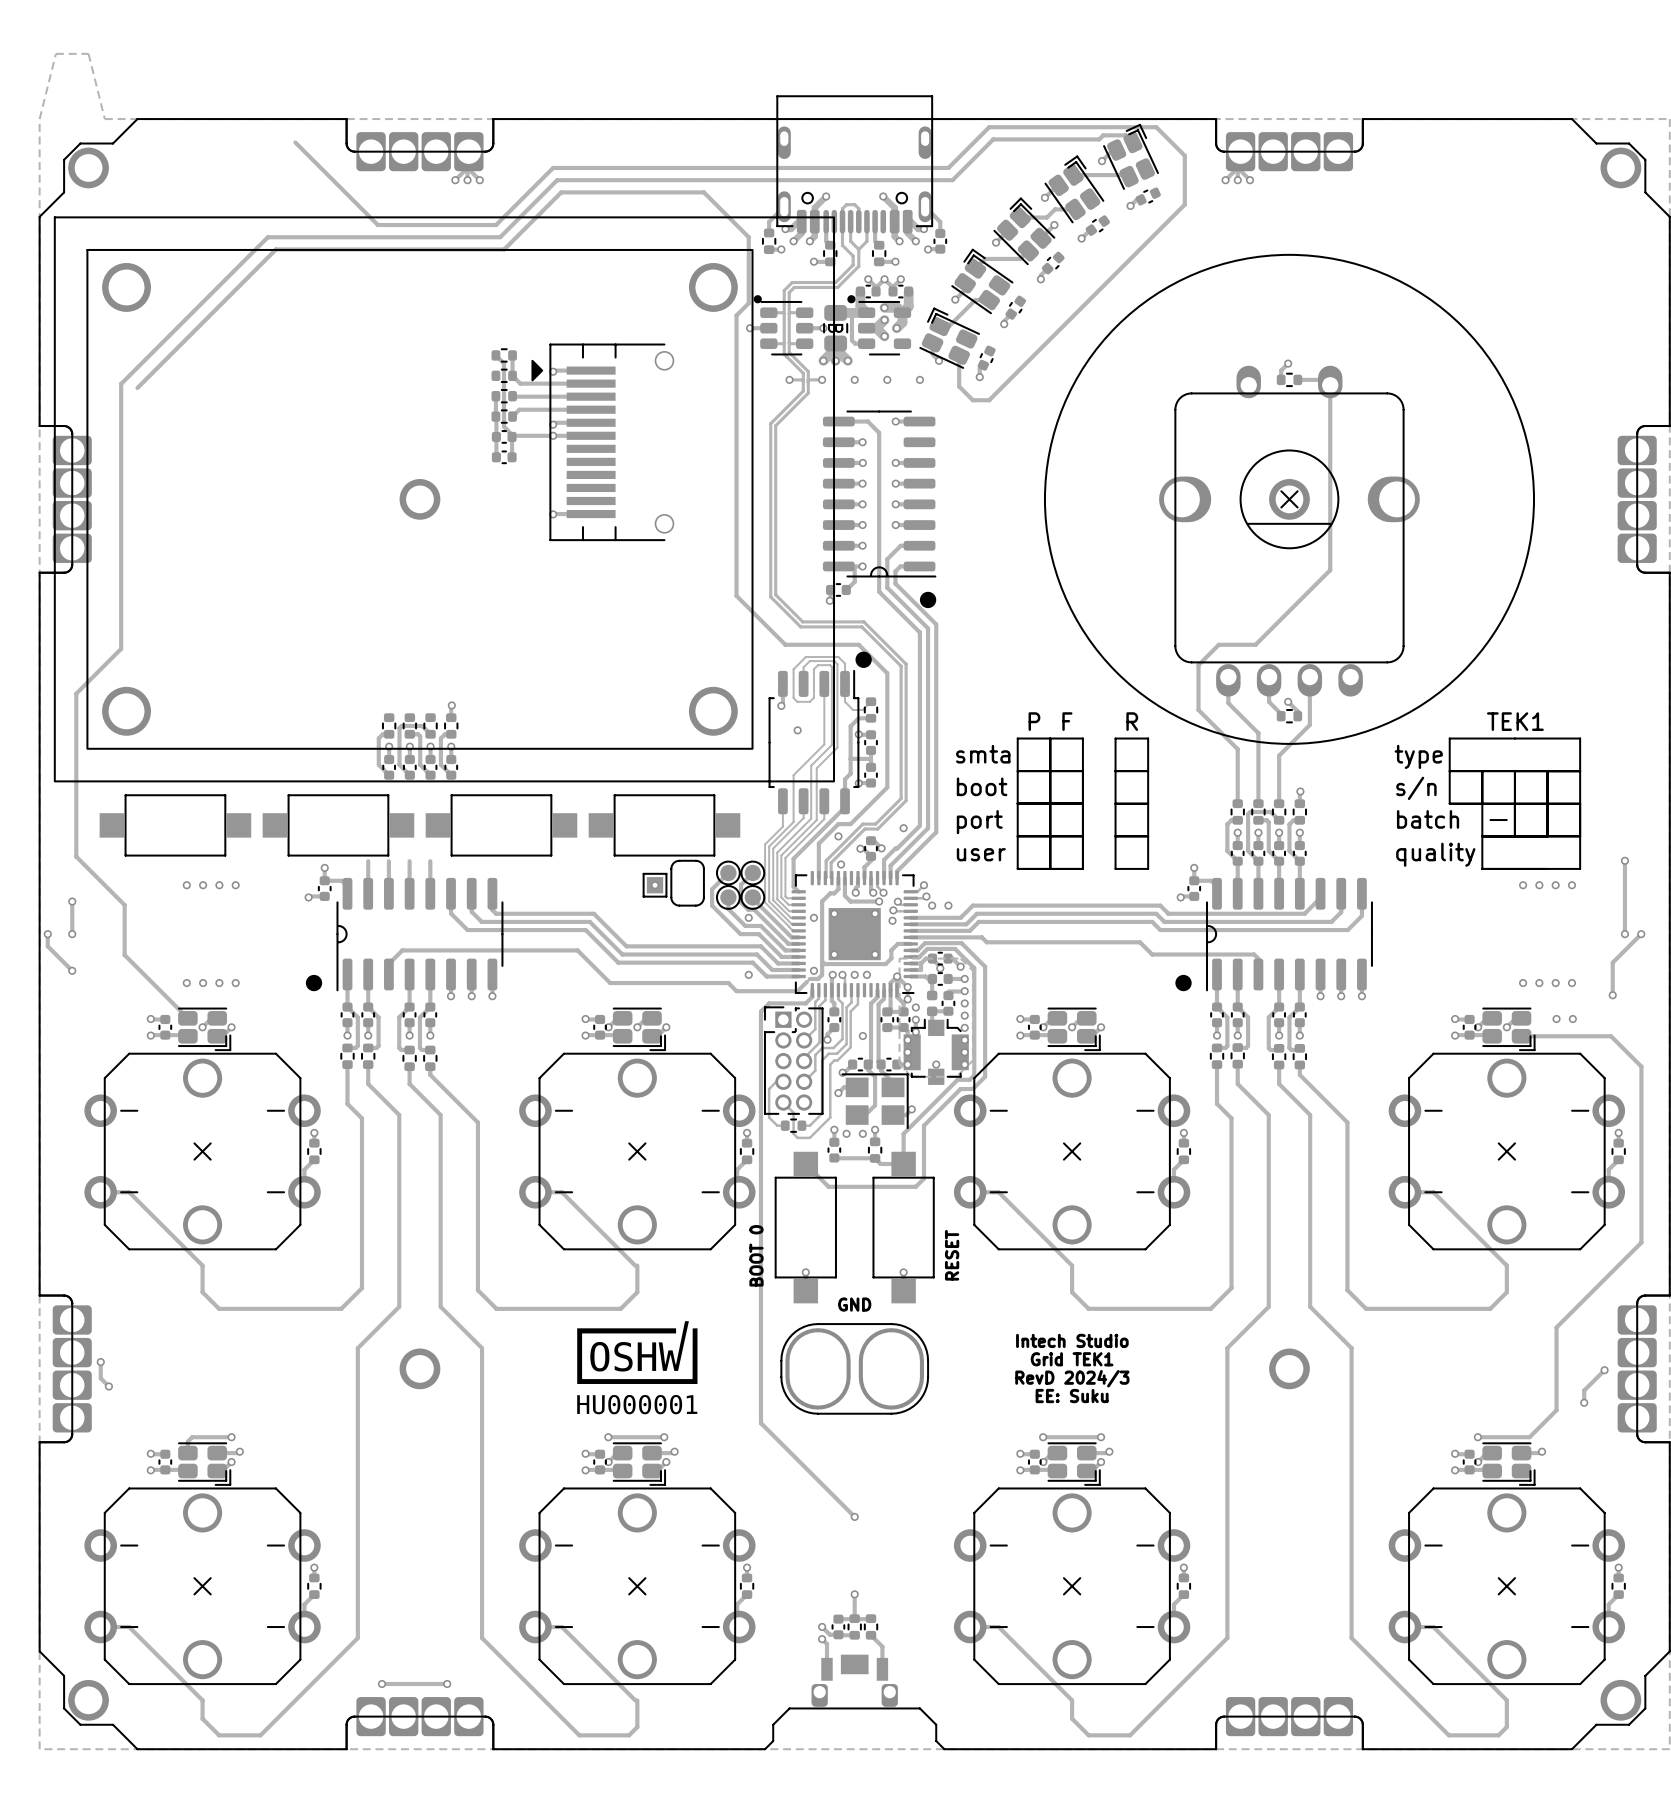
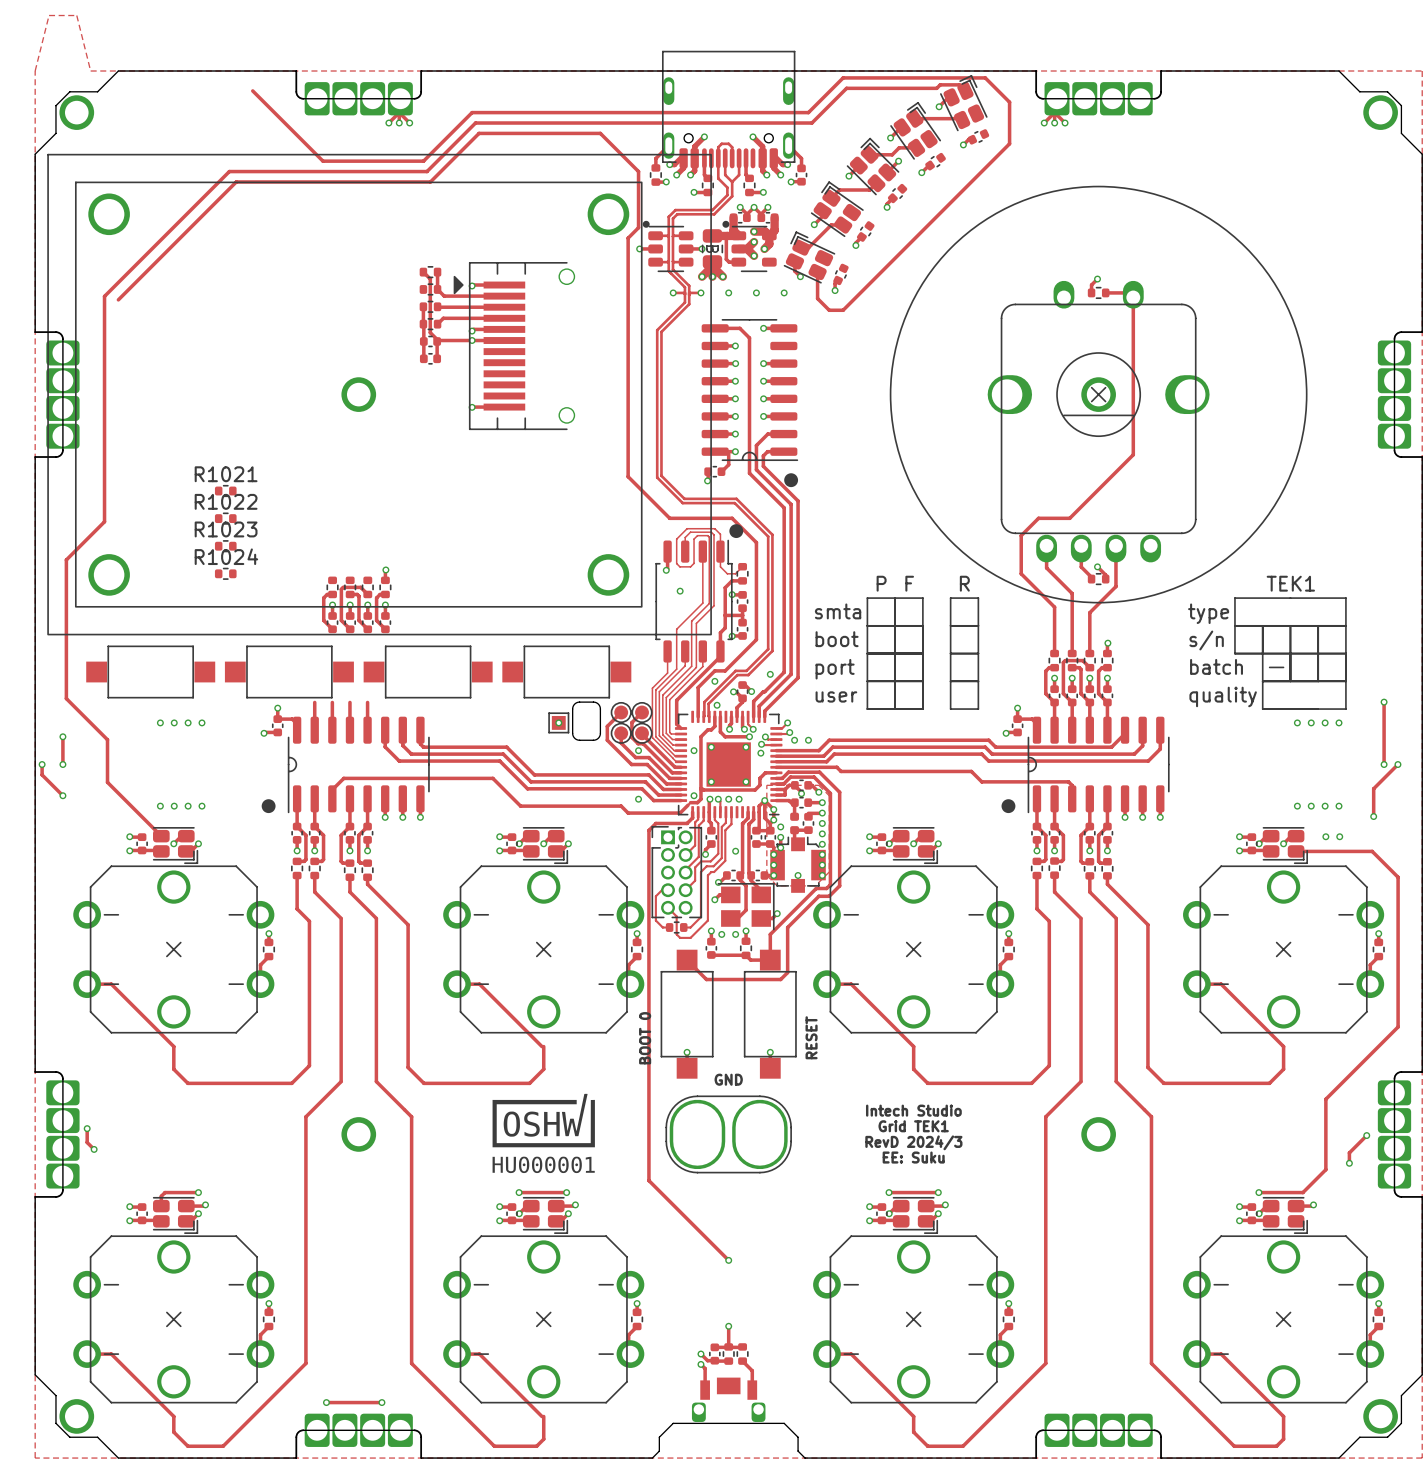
R1021: none -> (225, 491)
R1022: none -> (225, 518)
R1023: none -> (225, 546)
R1024: none -> (225, 573)

